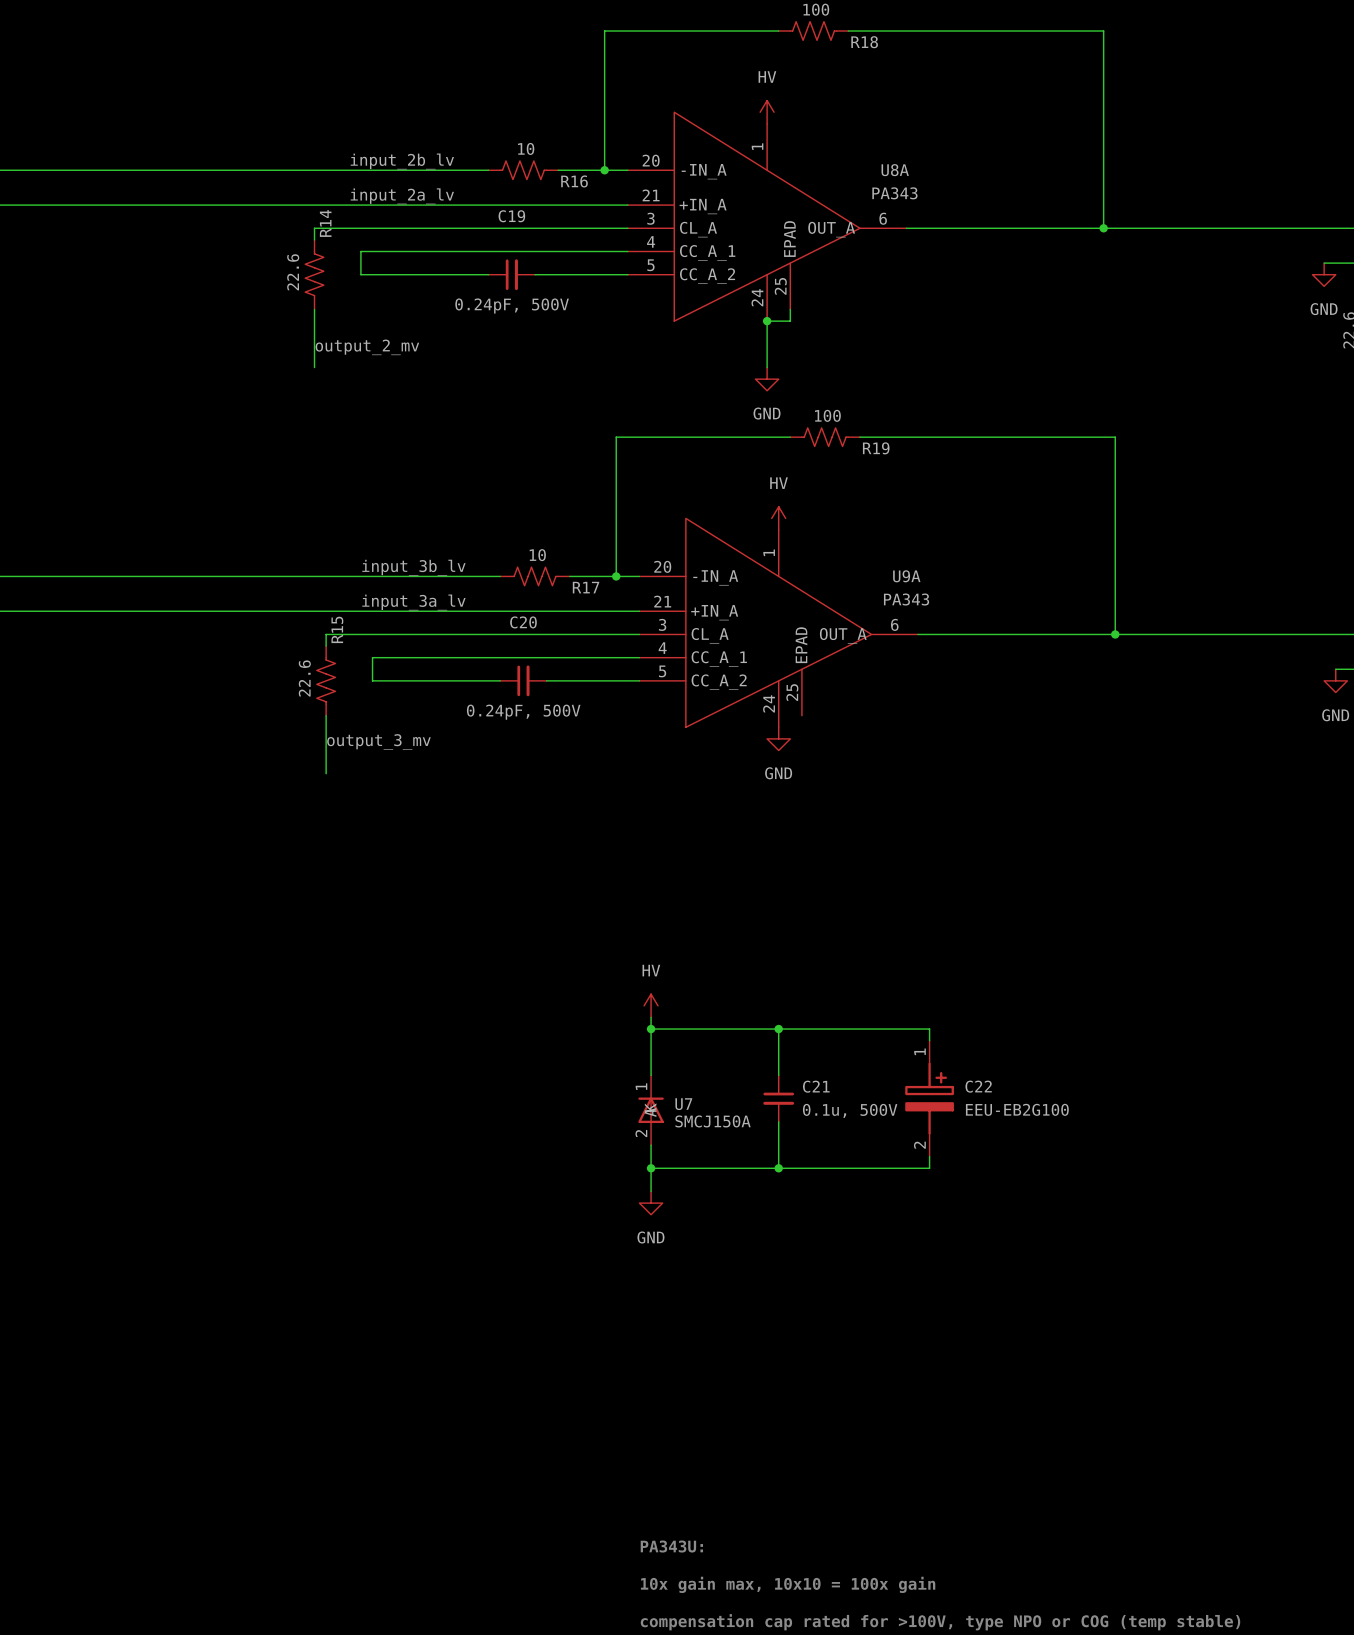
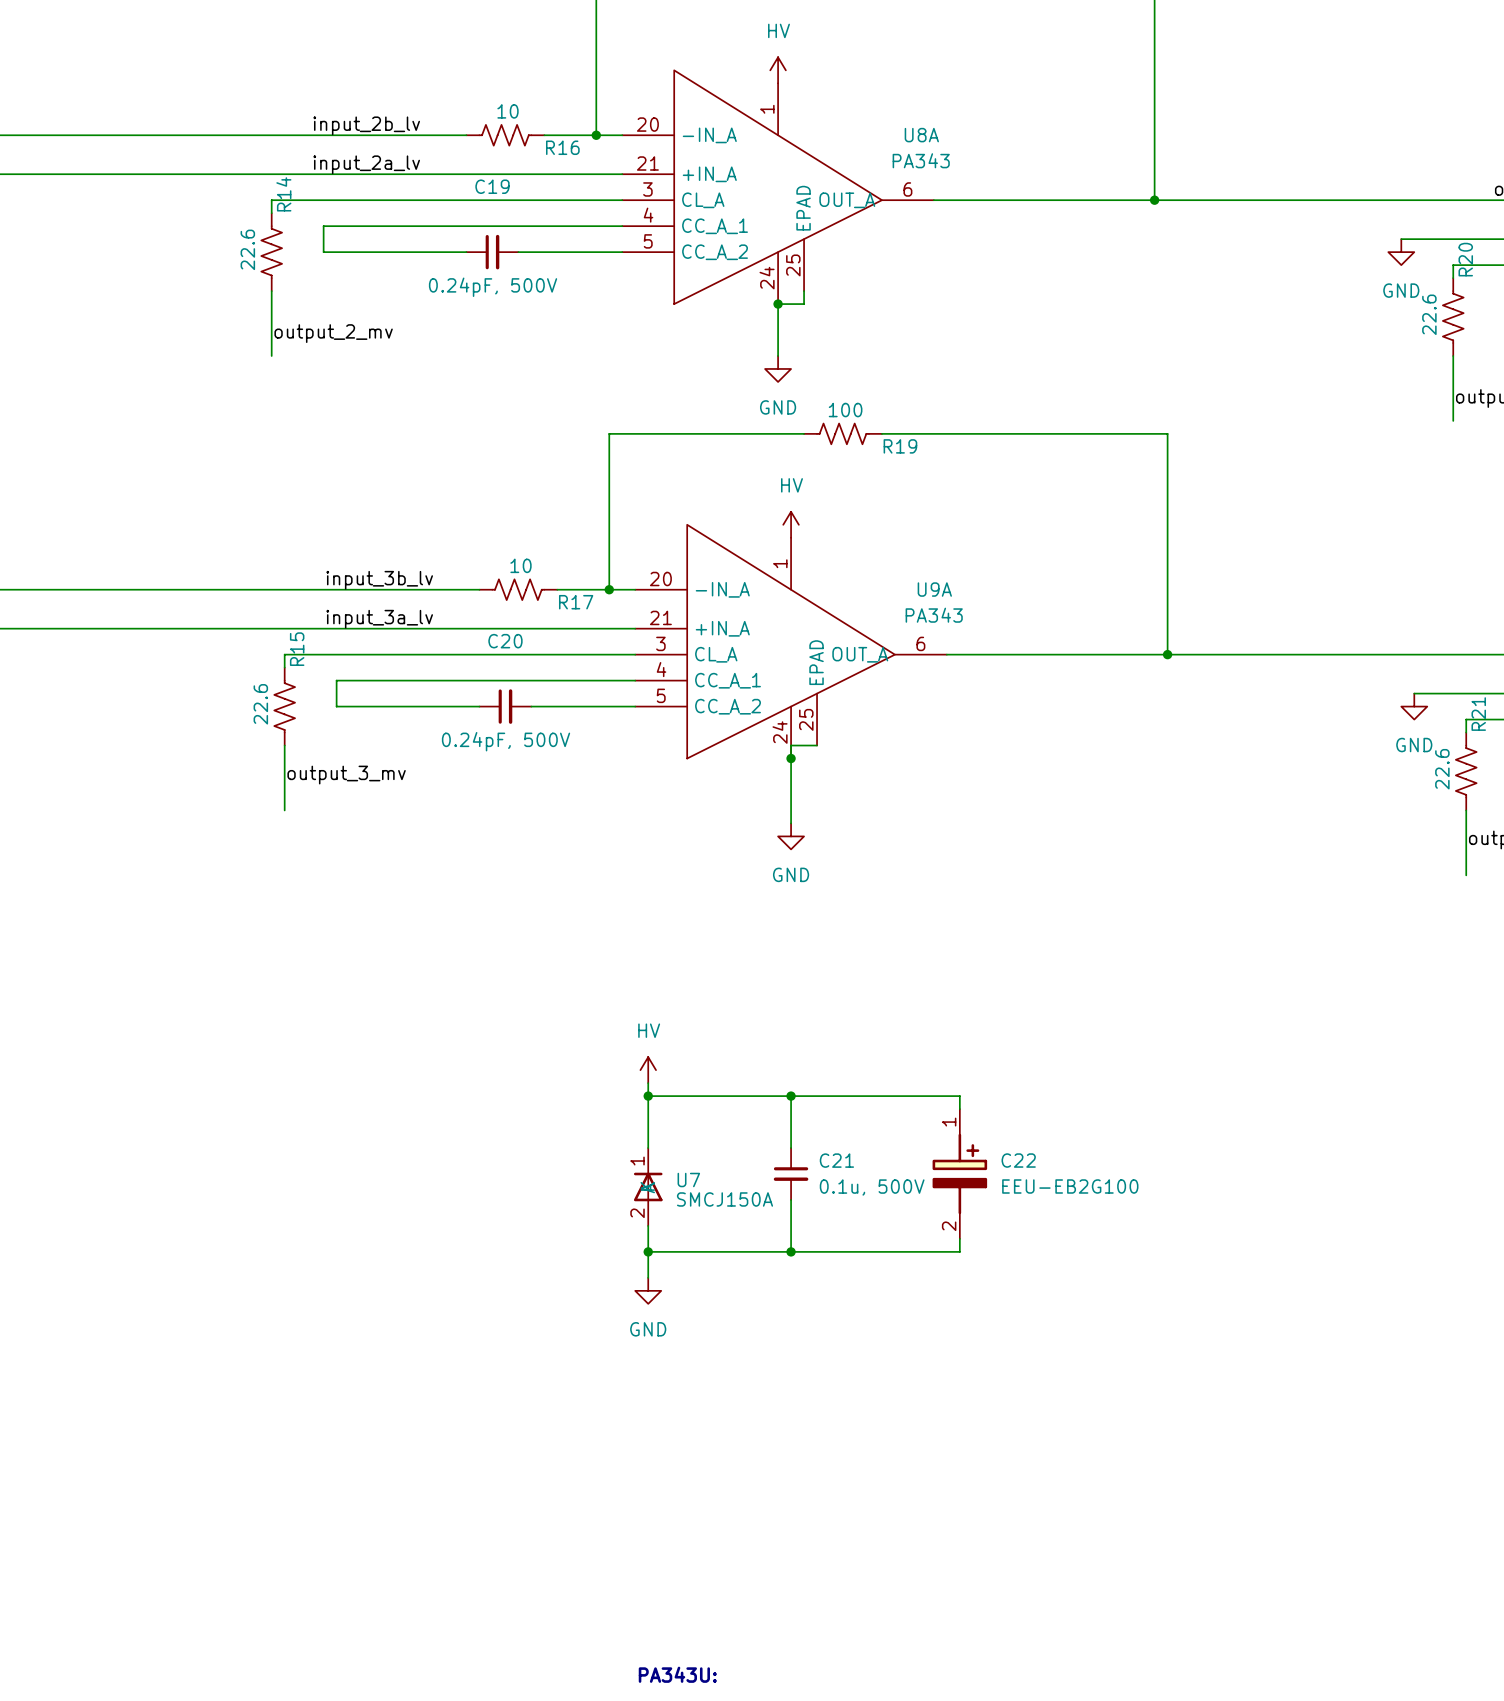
wire: none -> (817, 745) (791, 745) (791, 823)
junction: none -> (791, 758)
power symbol position: GND (778, 738) -> GND (791, 836)

